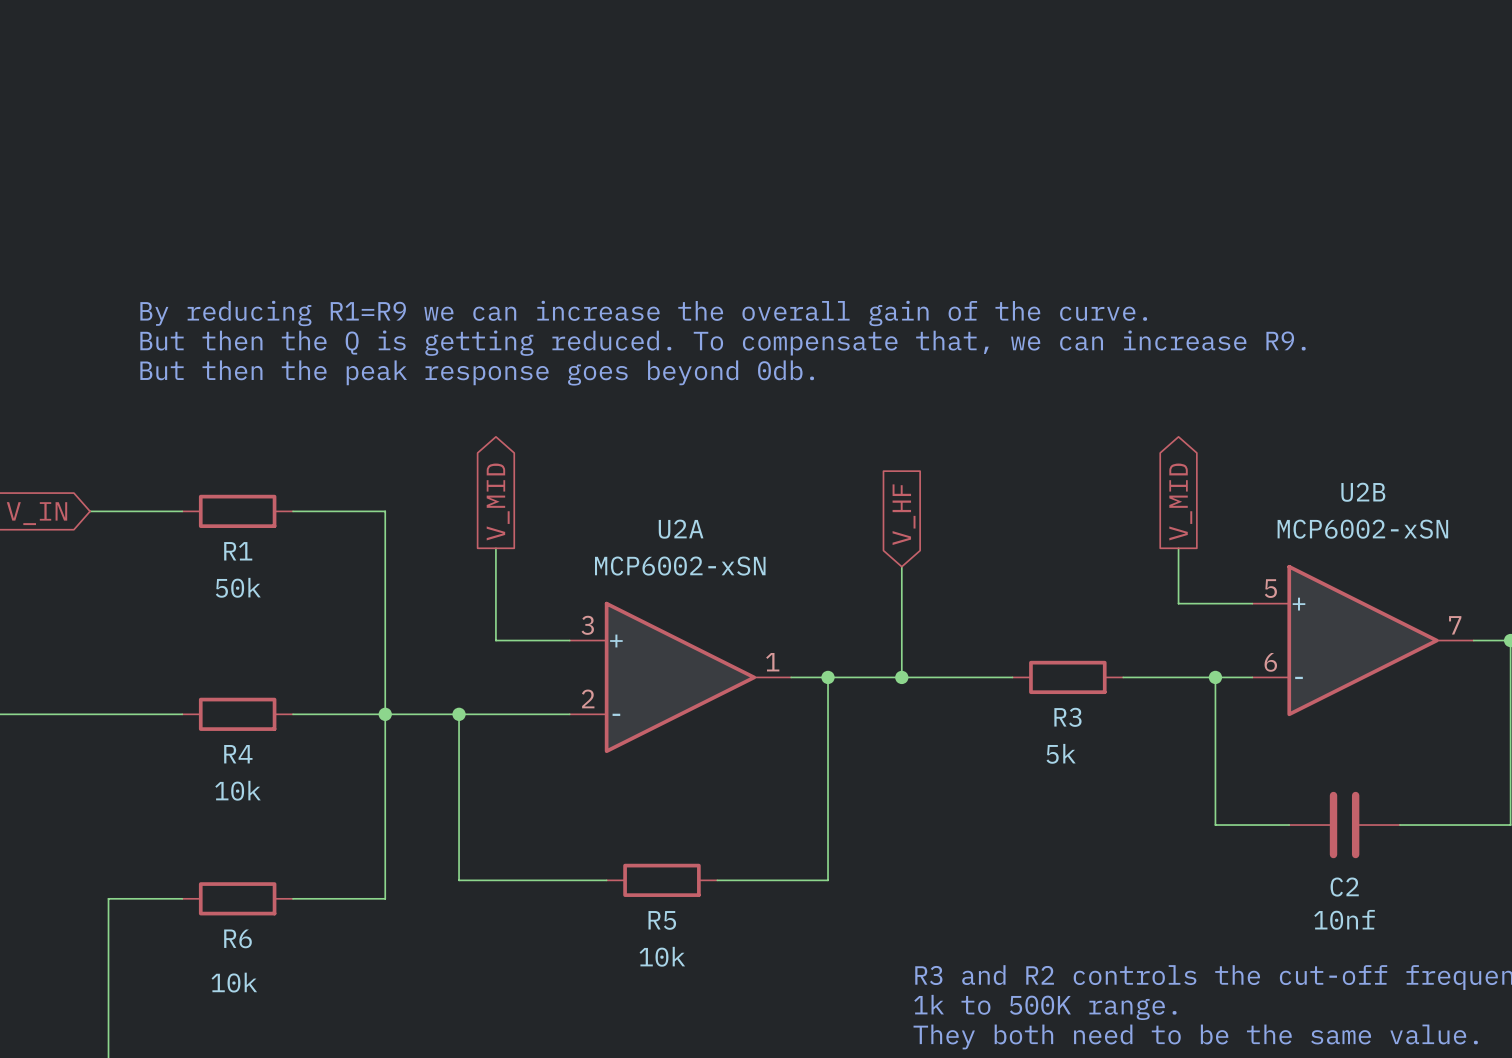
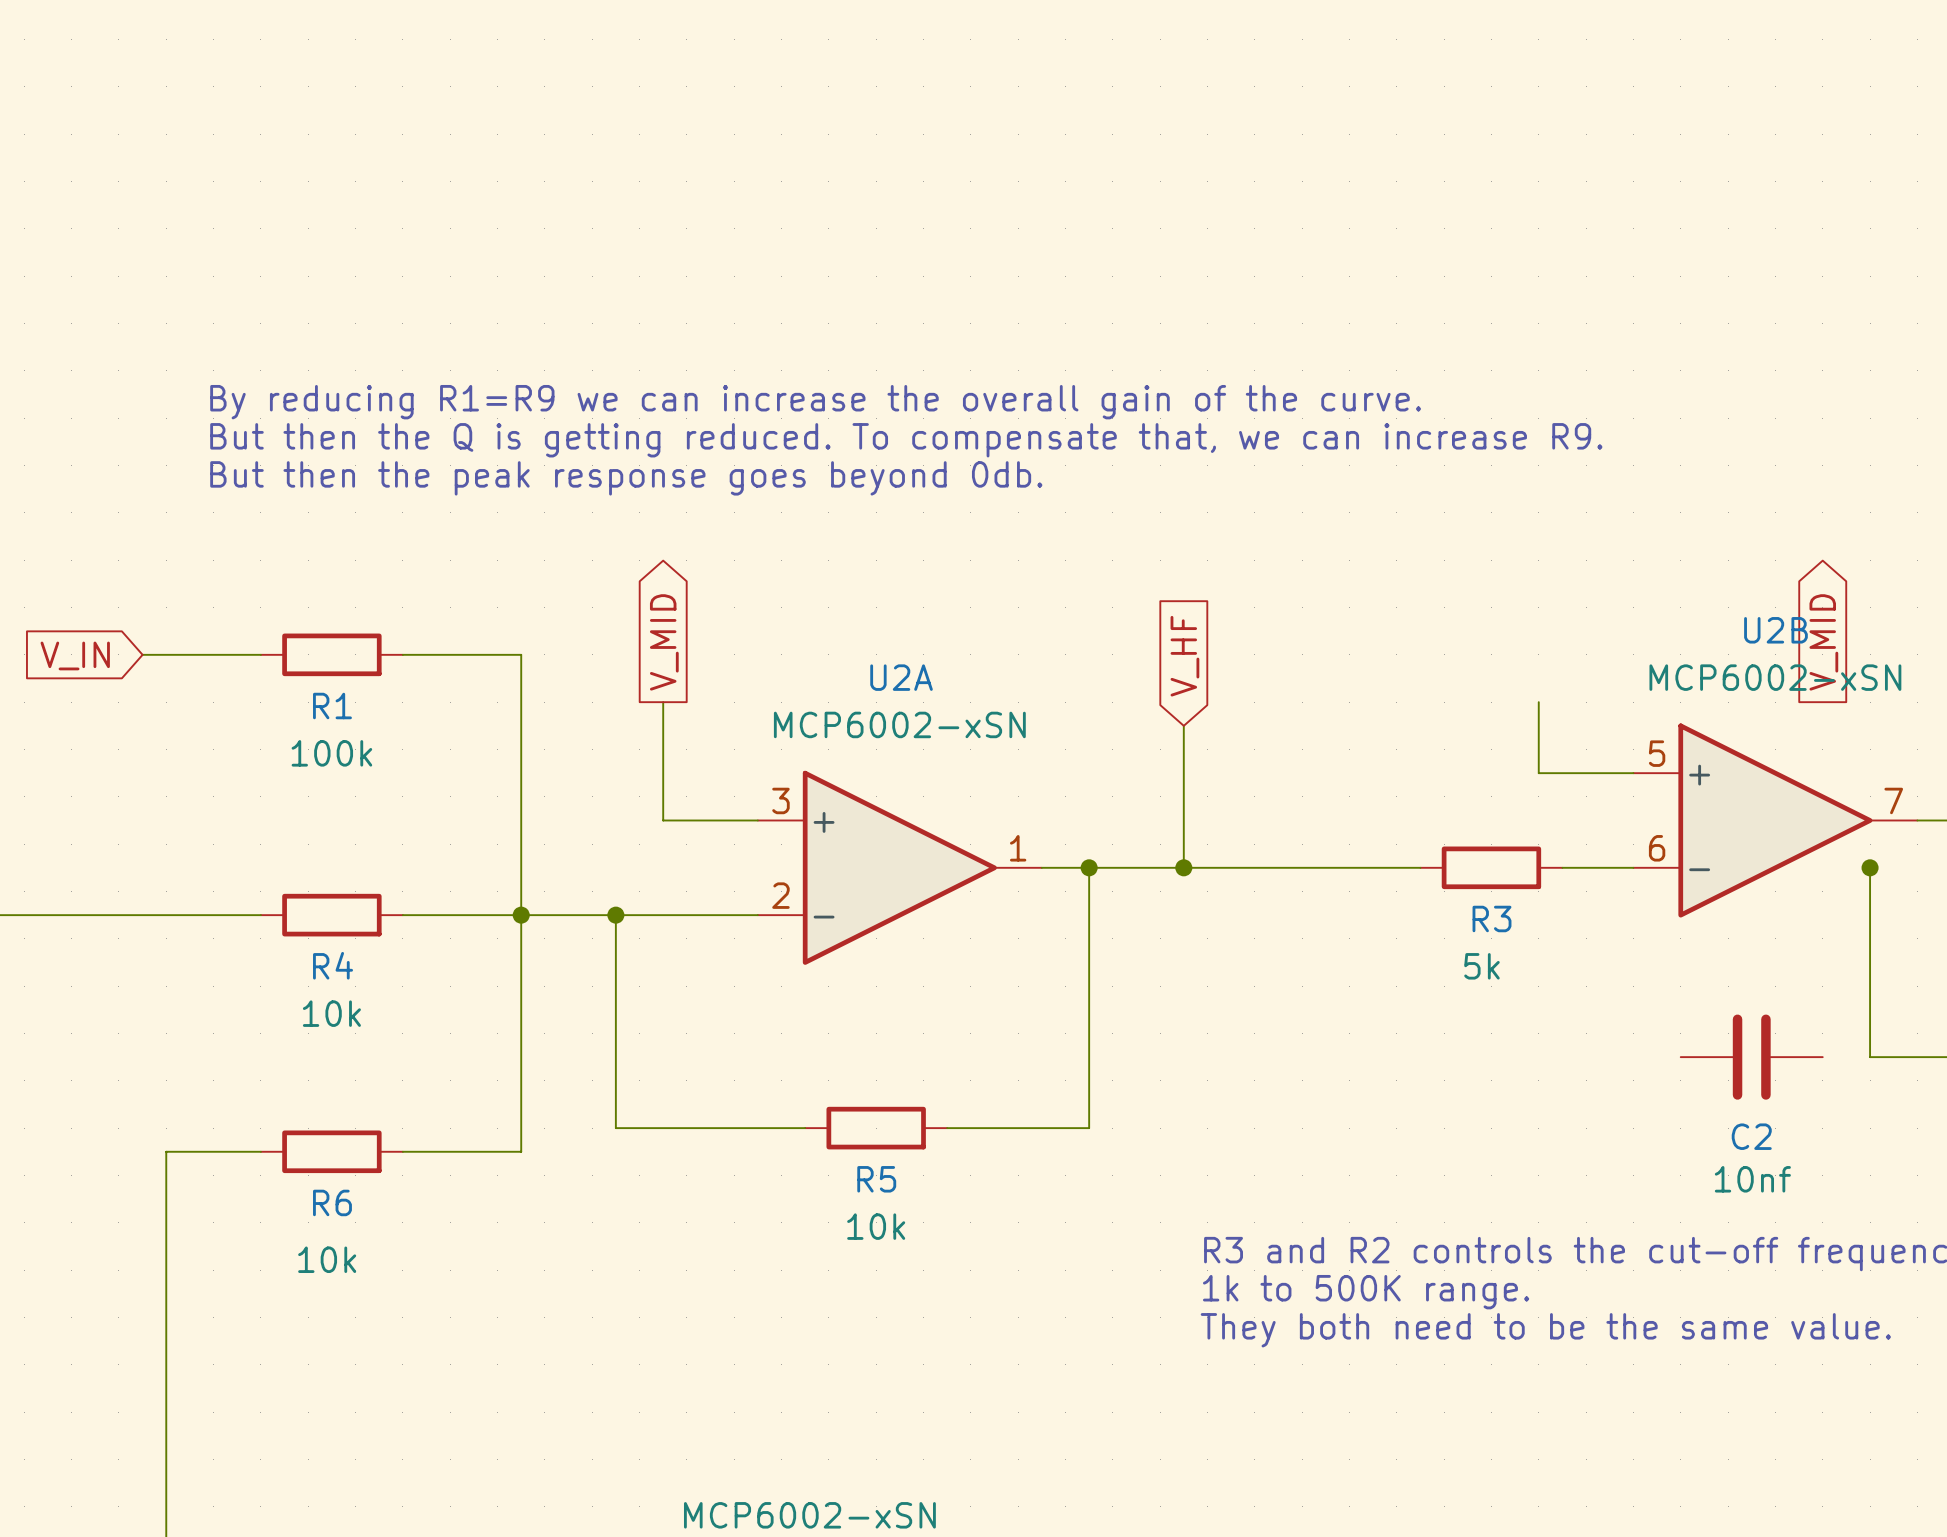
global label: V_MID (1180, 501) -> none
global label: none -> V_MID (1823, 642)
R1 value: 50k (238, 587) -> 100k (331, 753)
R3 position: (1067, 677) -> (1491, 867)
wire: (1123, 677) (1196, 677) -> (1325, 867) (1420, 867)
wire: (1215, 677) (1215, 825) (1289, 825) -> none
junction: (1215, 677) -> none
junction: none -> (1870, 867)
wire: (1399, 825) (1436, 825) -> (1870, 867) (1870, 1057)

